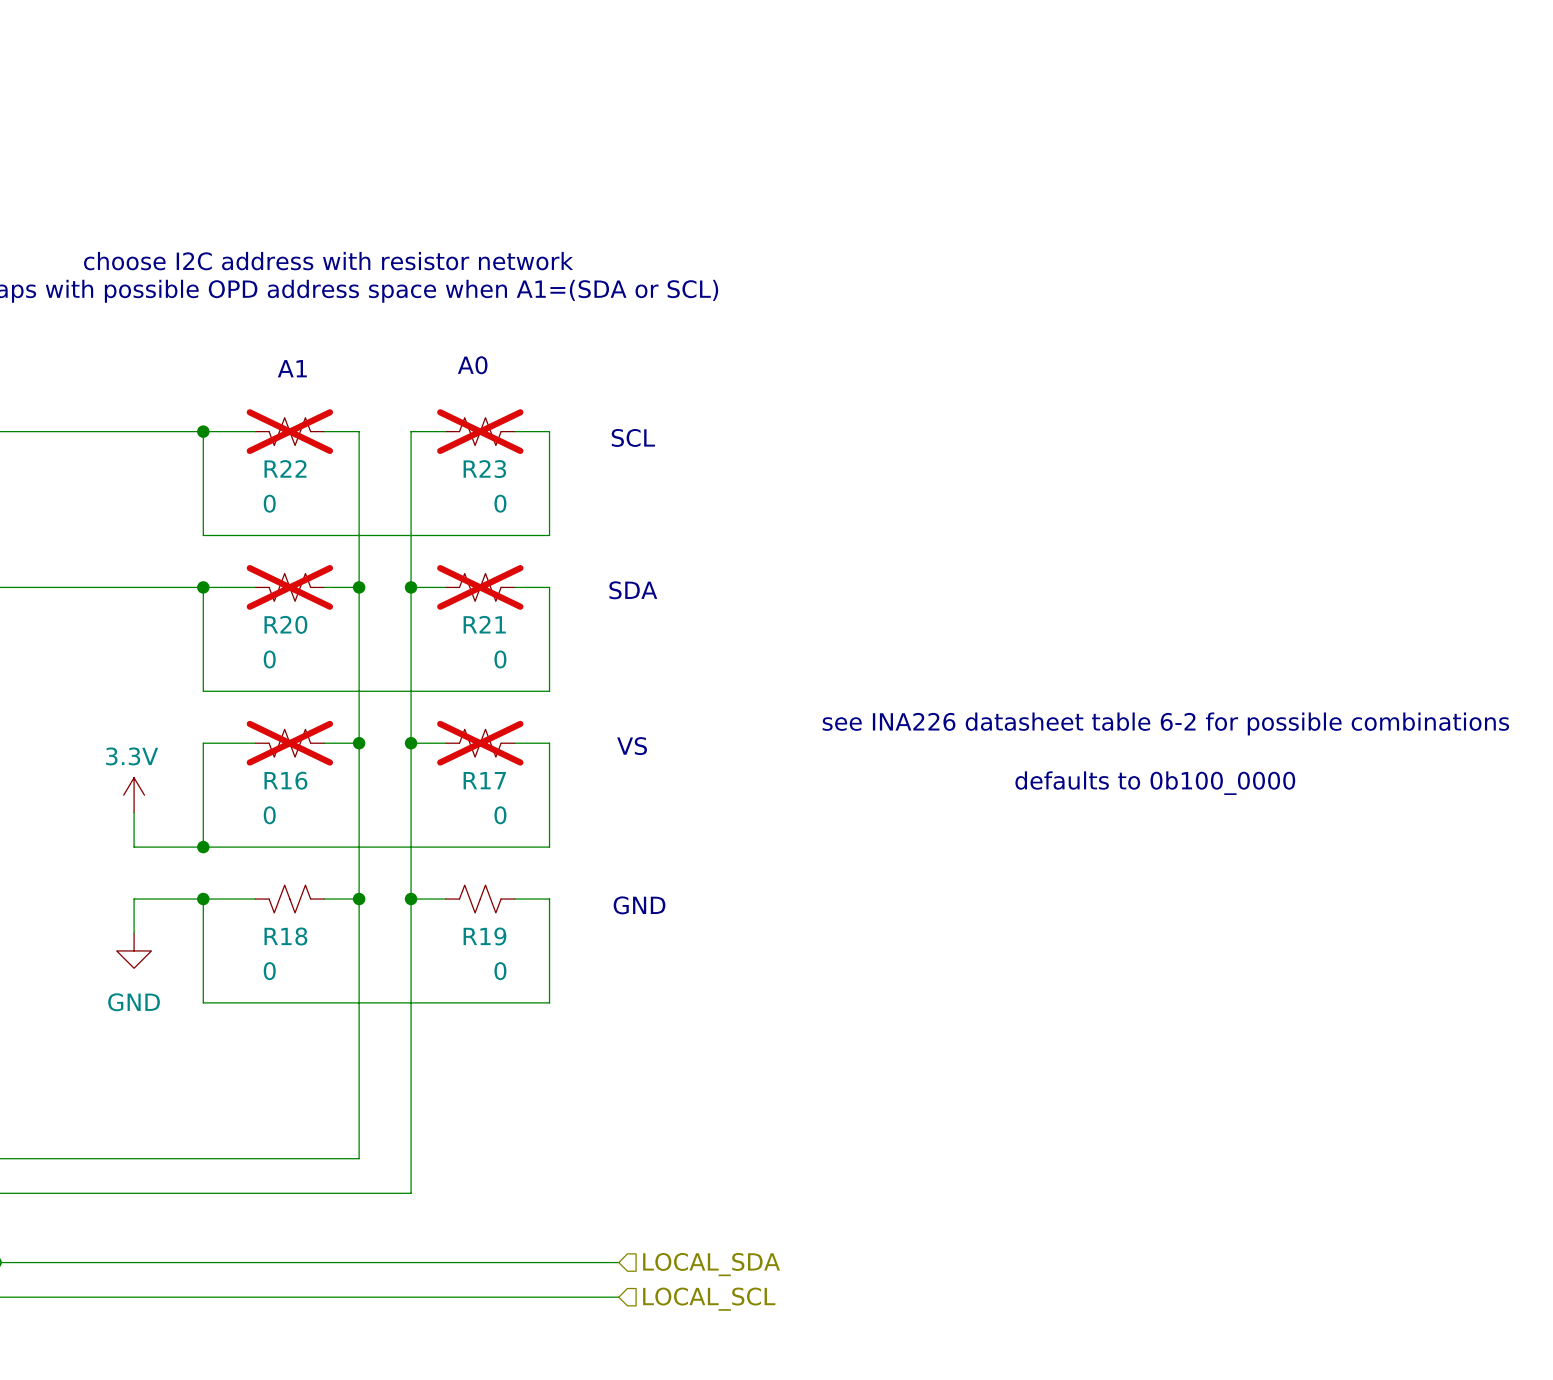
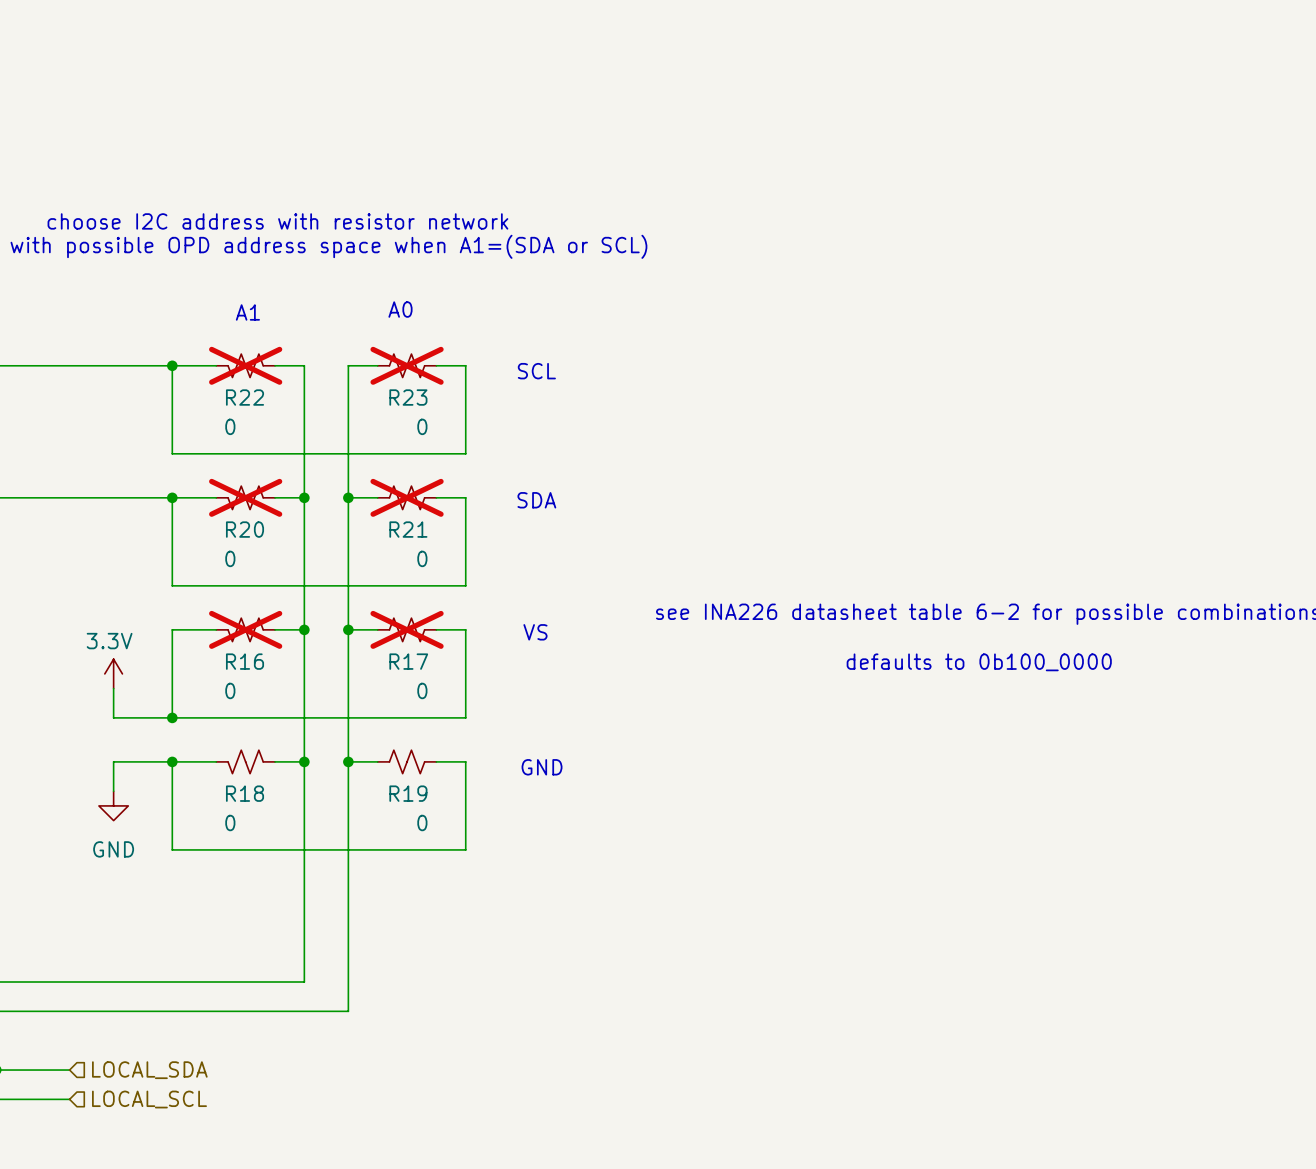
wire: (82, 1262) (618, 1262) -> none
hierarchical label: none -> LOCAL_SDA (149, 1070)
hierarchical label: LOCAL_SDA (711, 1264) -> none
wire: (82, 1297) (618, 1297) -> none
hierarchical label: none -> LOCAL_SCL (149, 1099)
hierarchical label: LOCAL_SCL (709, 1299) -> none

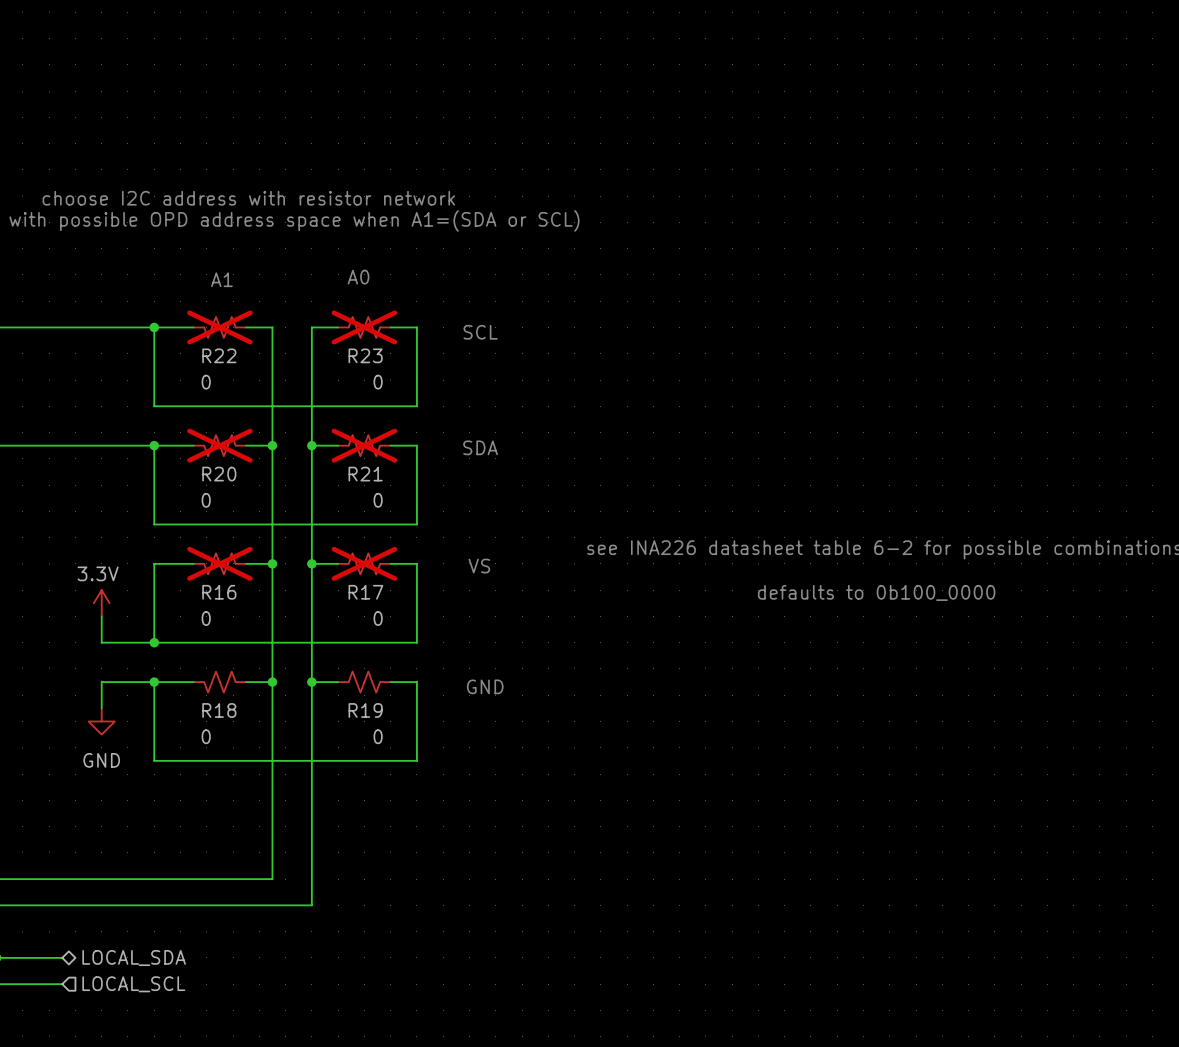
hierarchical label shape: input (149, 1070) -> bidirectional (134, 958)

